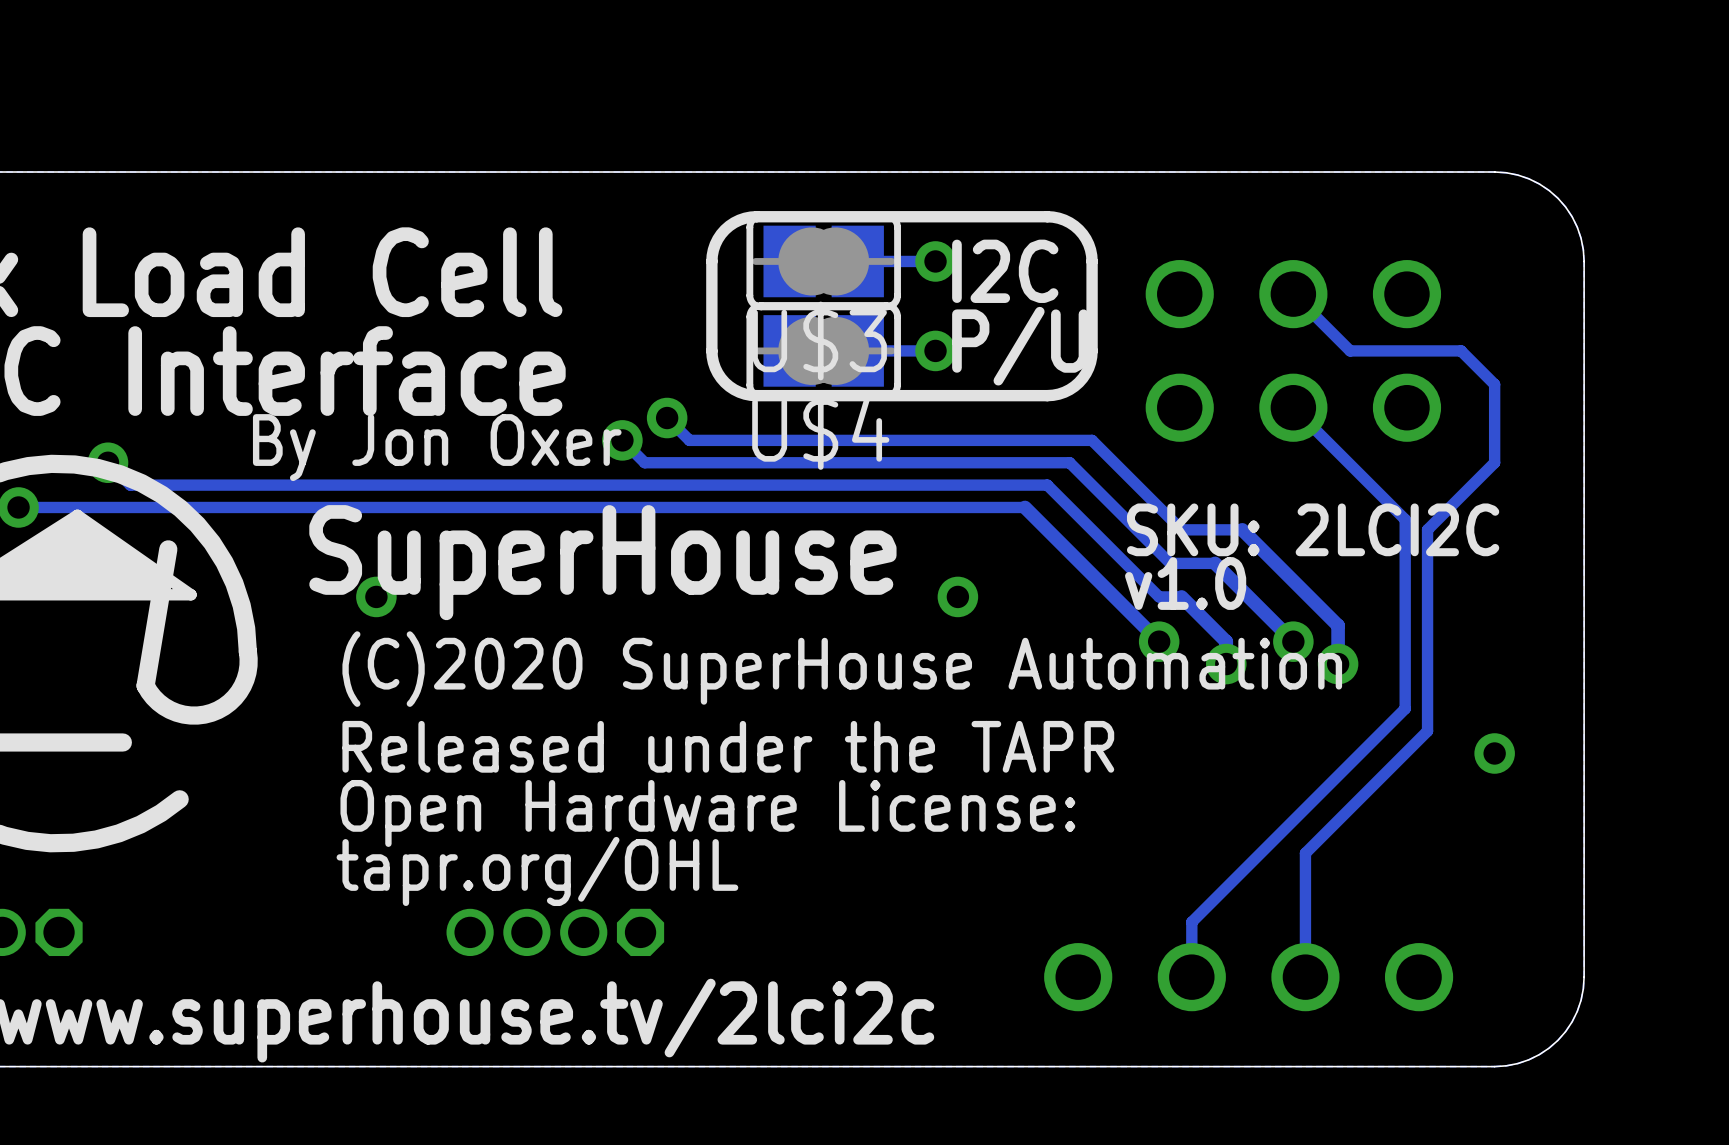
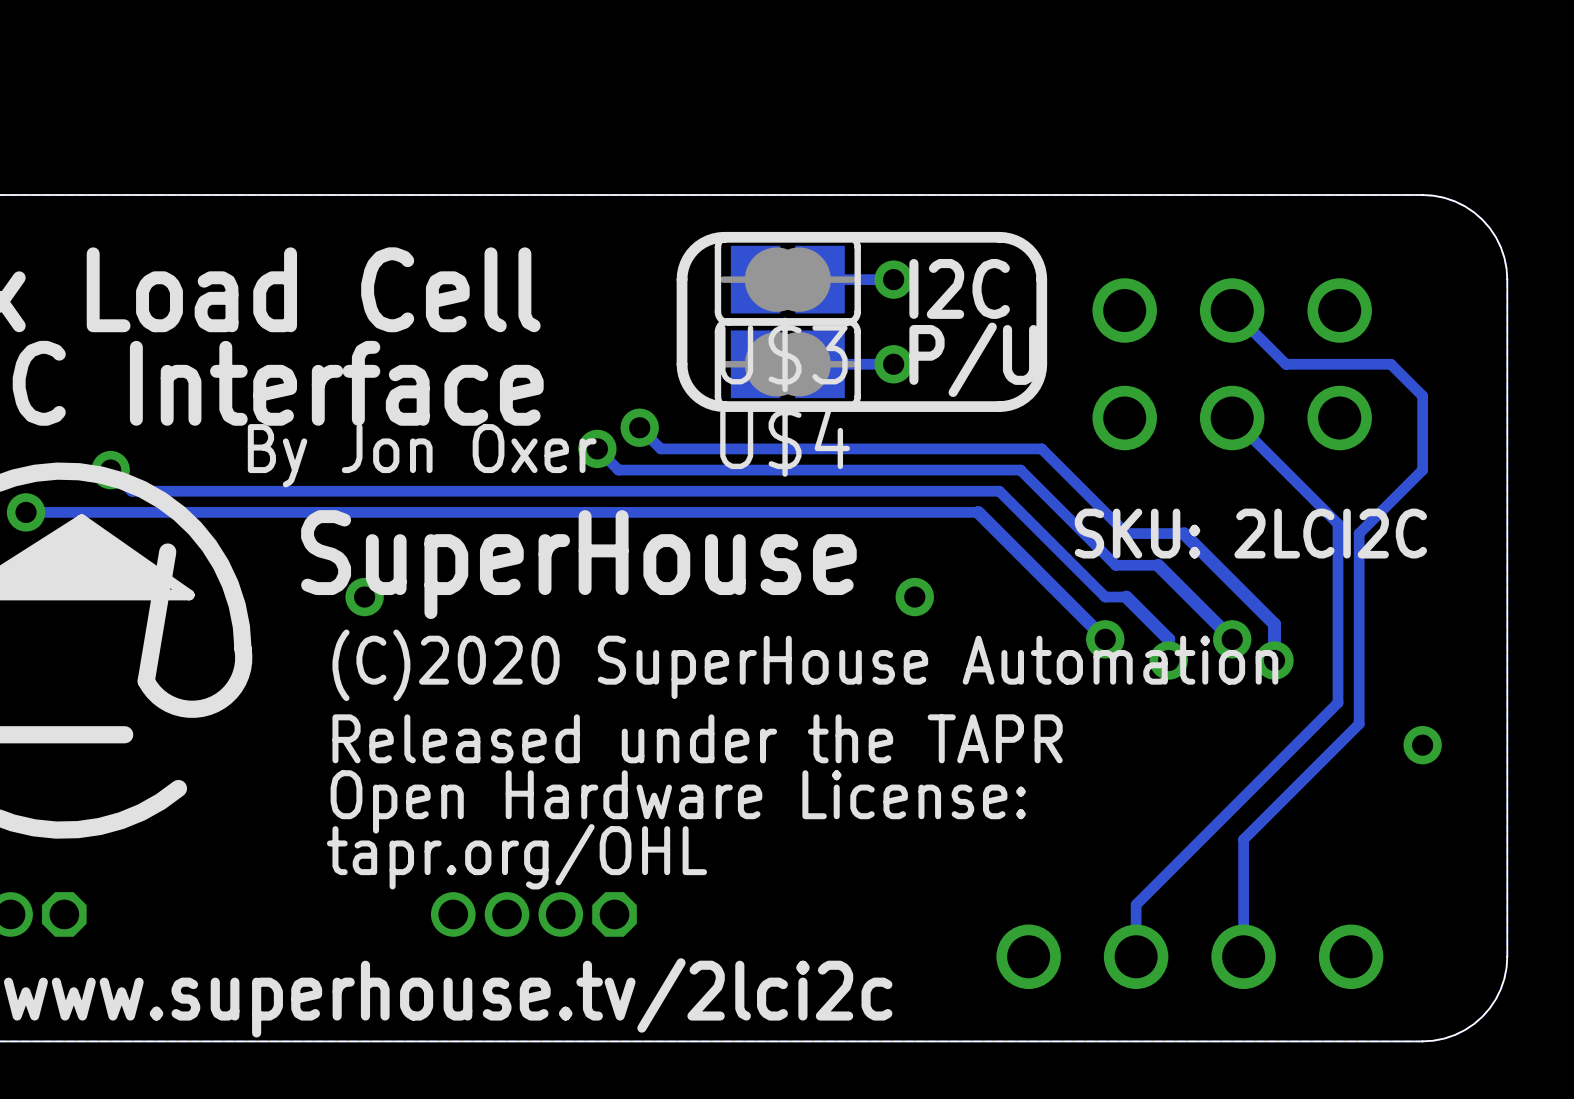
text: v1.0 (1185, 583) -> none

